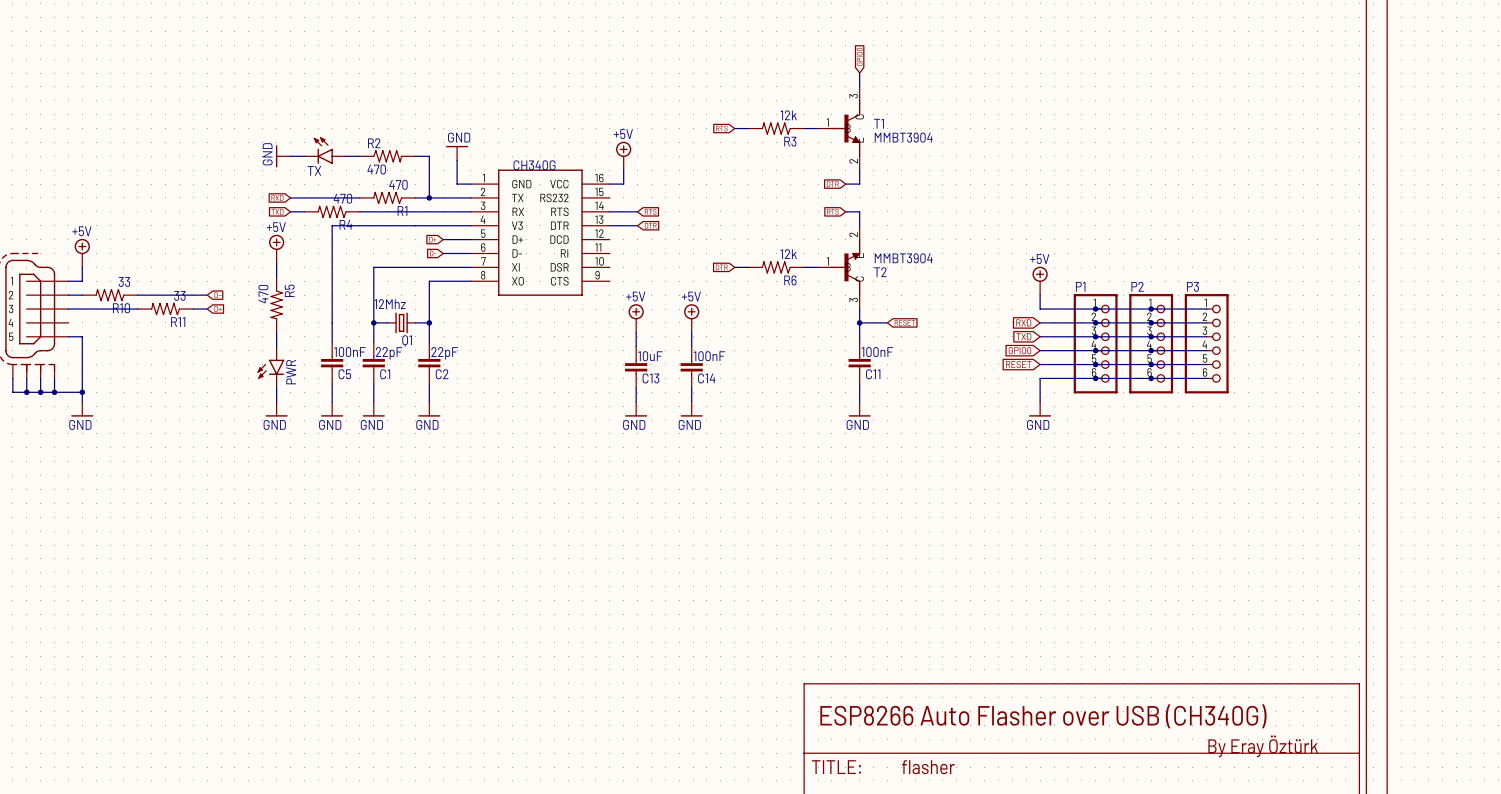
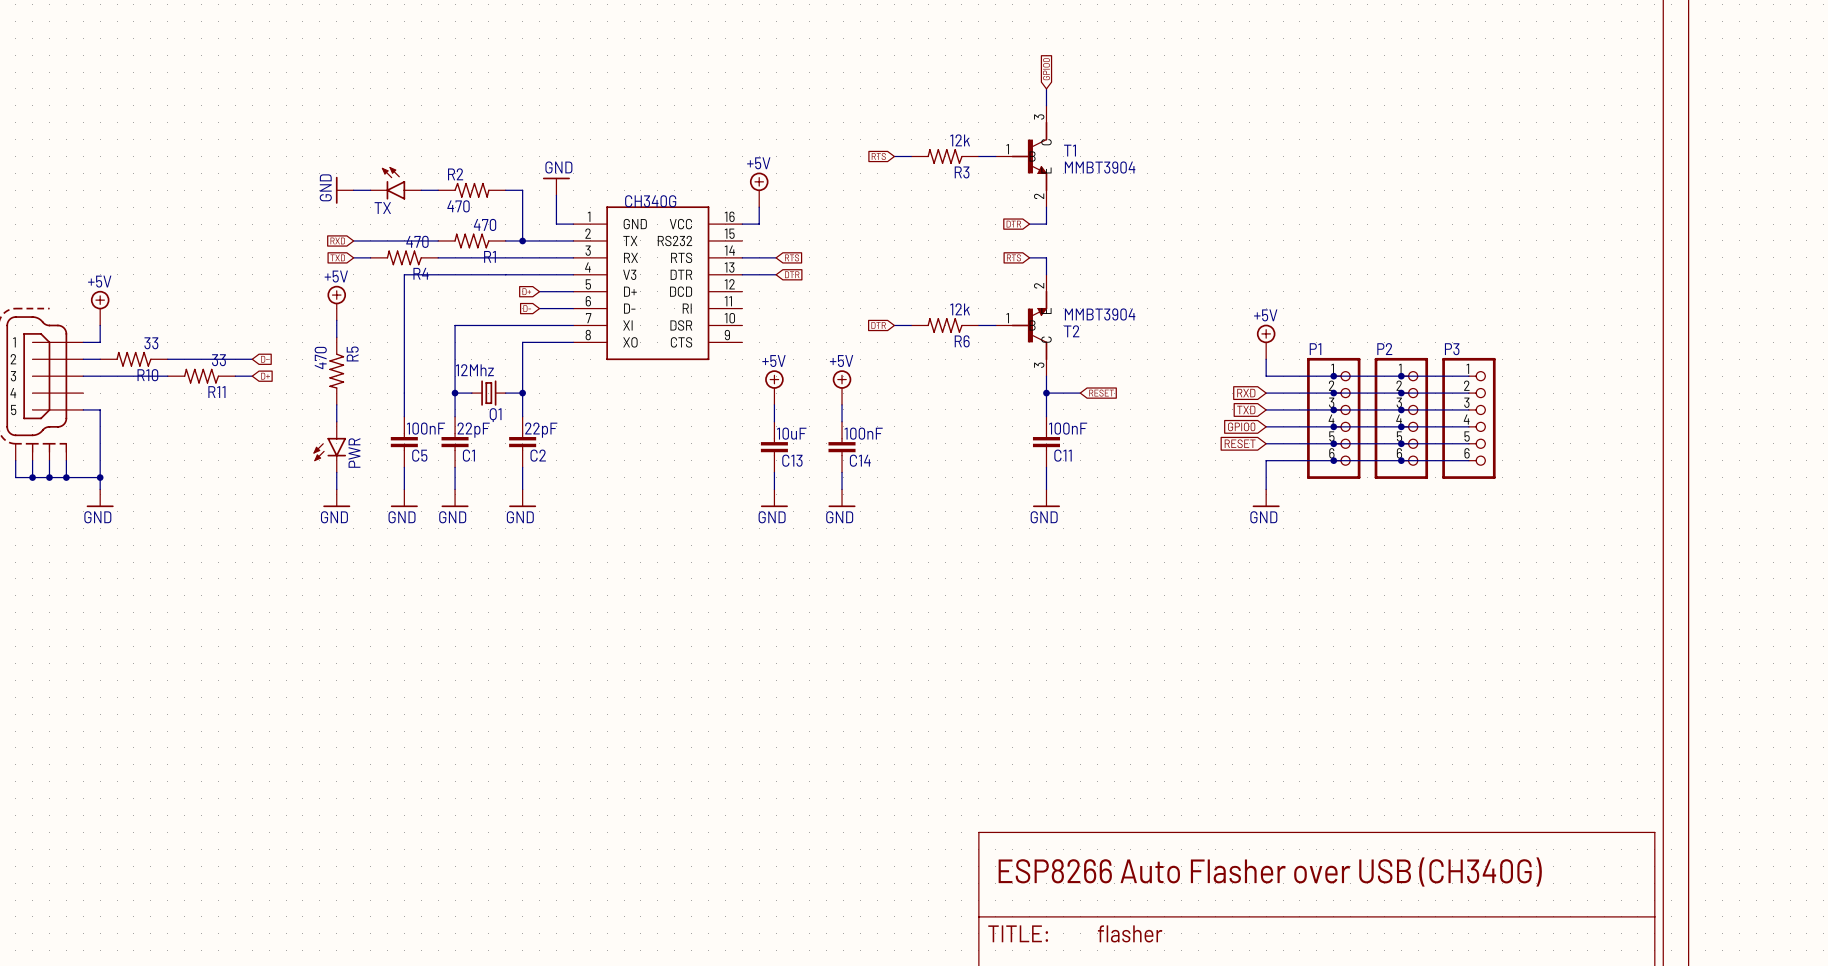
text: By Eray Öztürk (1263, 746) -> none

